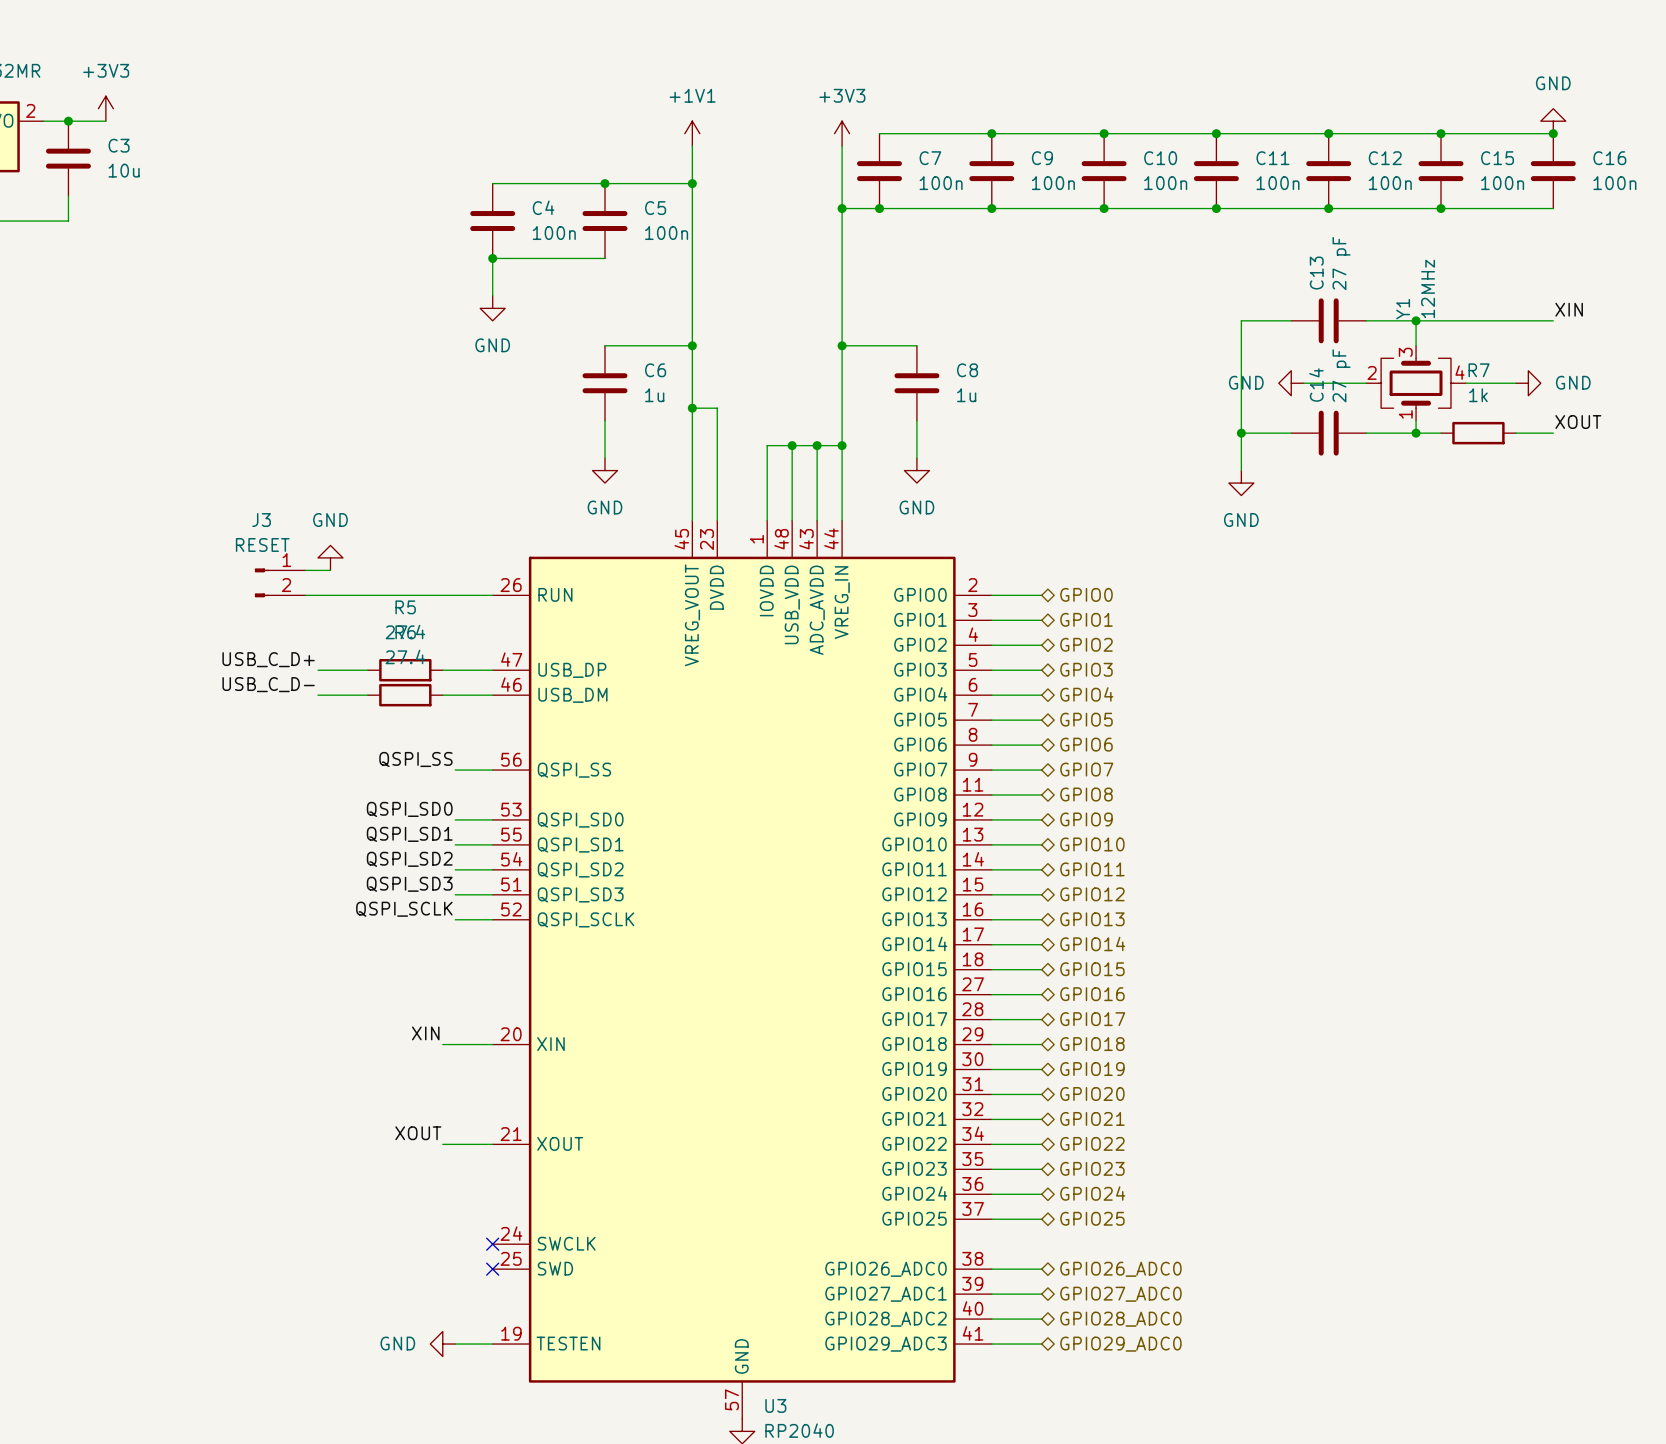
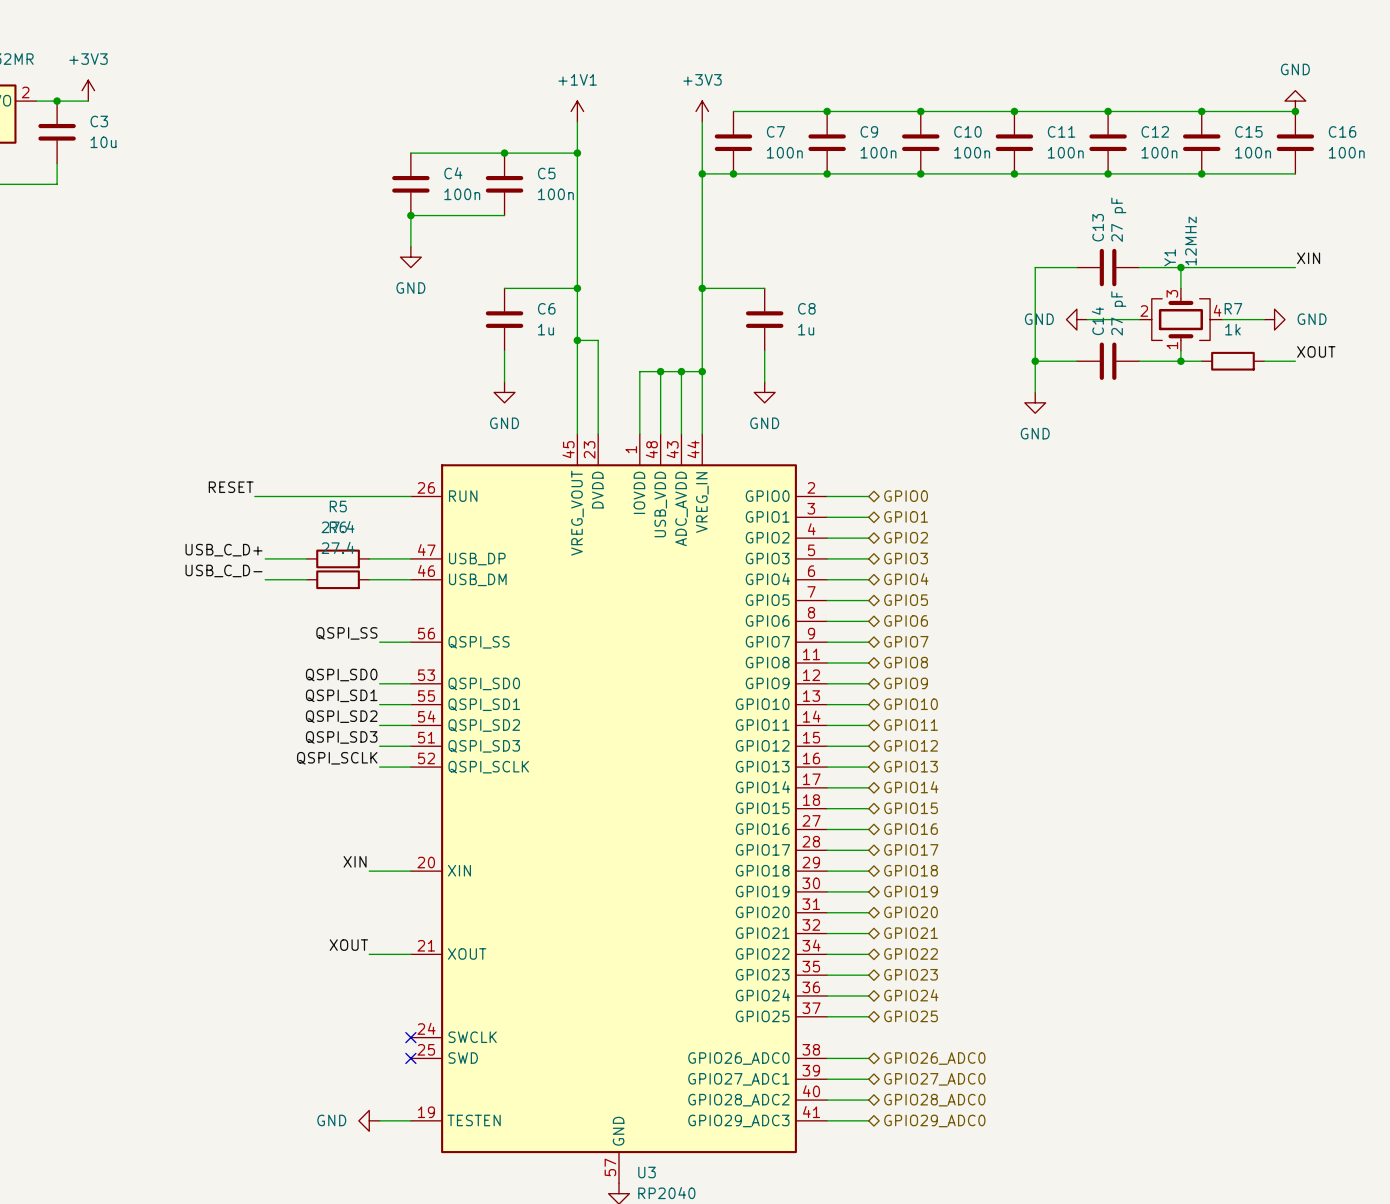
power symbol: GND (330, 557) -> none
wire: (305, 570) (330, 570) -> none
J3: RESET (280, 582) -> none
label: none -> RESET (231, 487)

